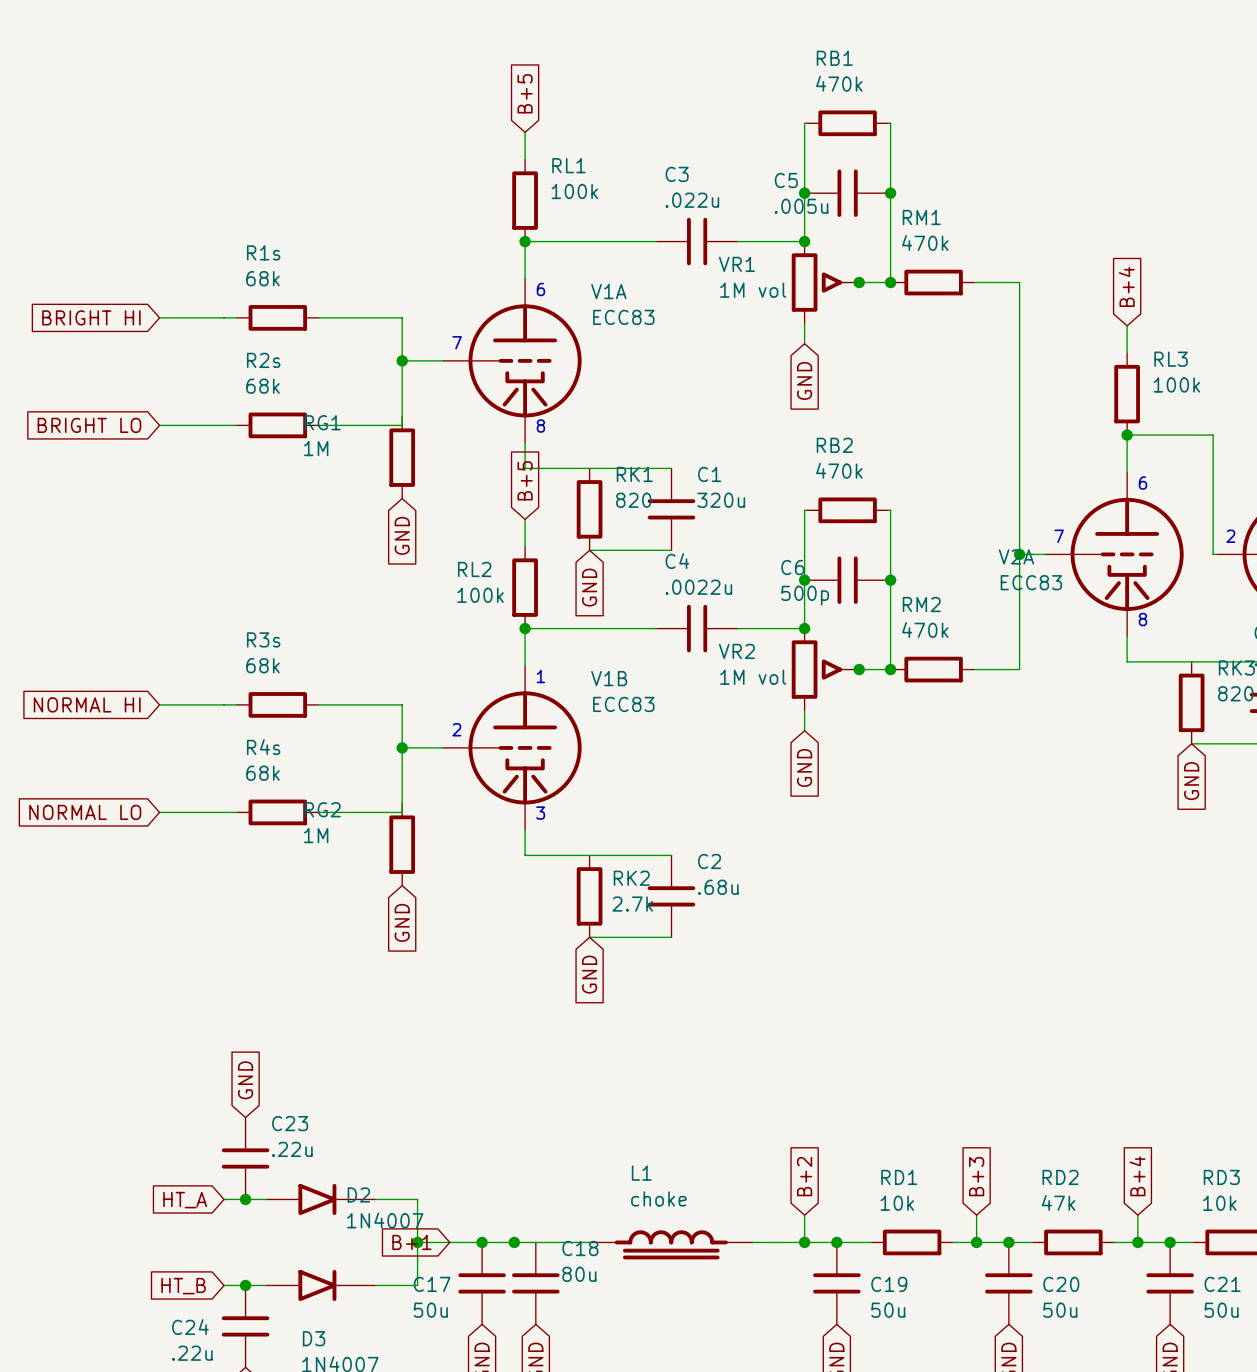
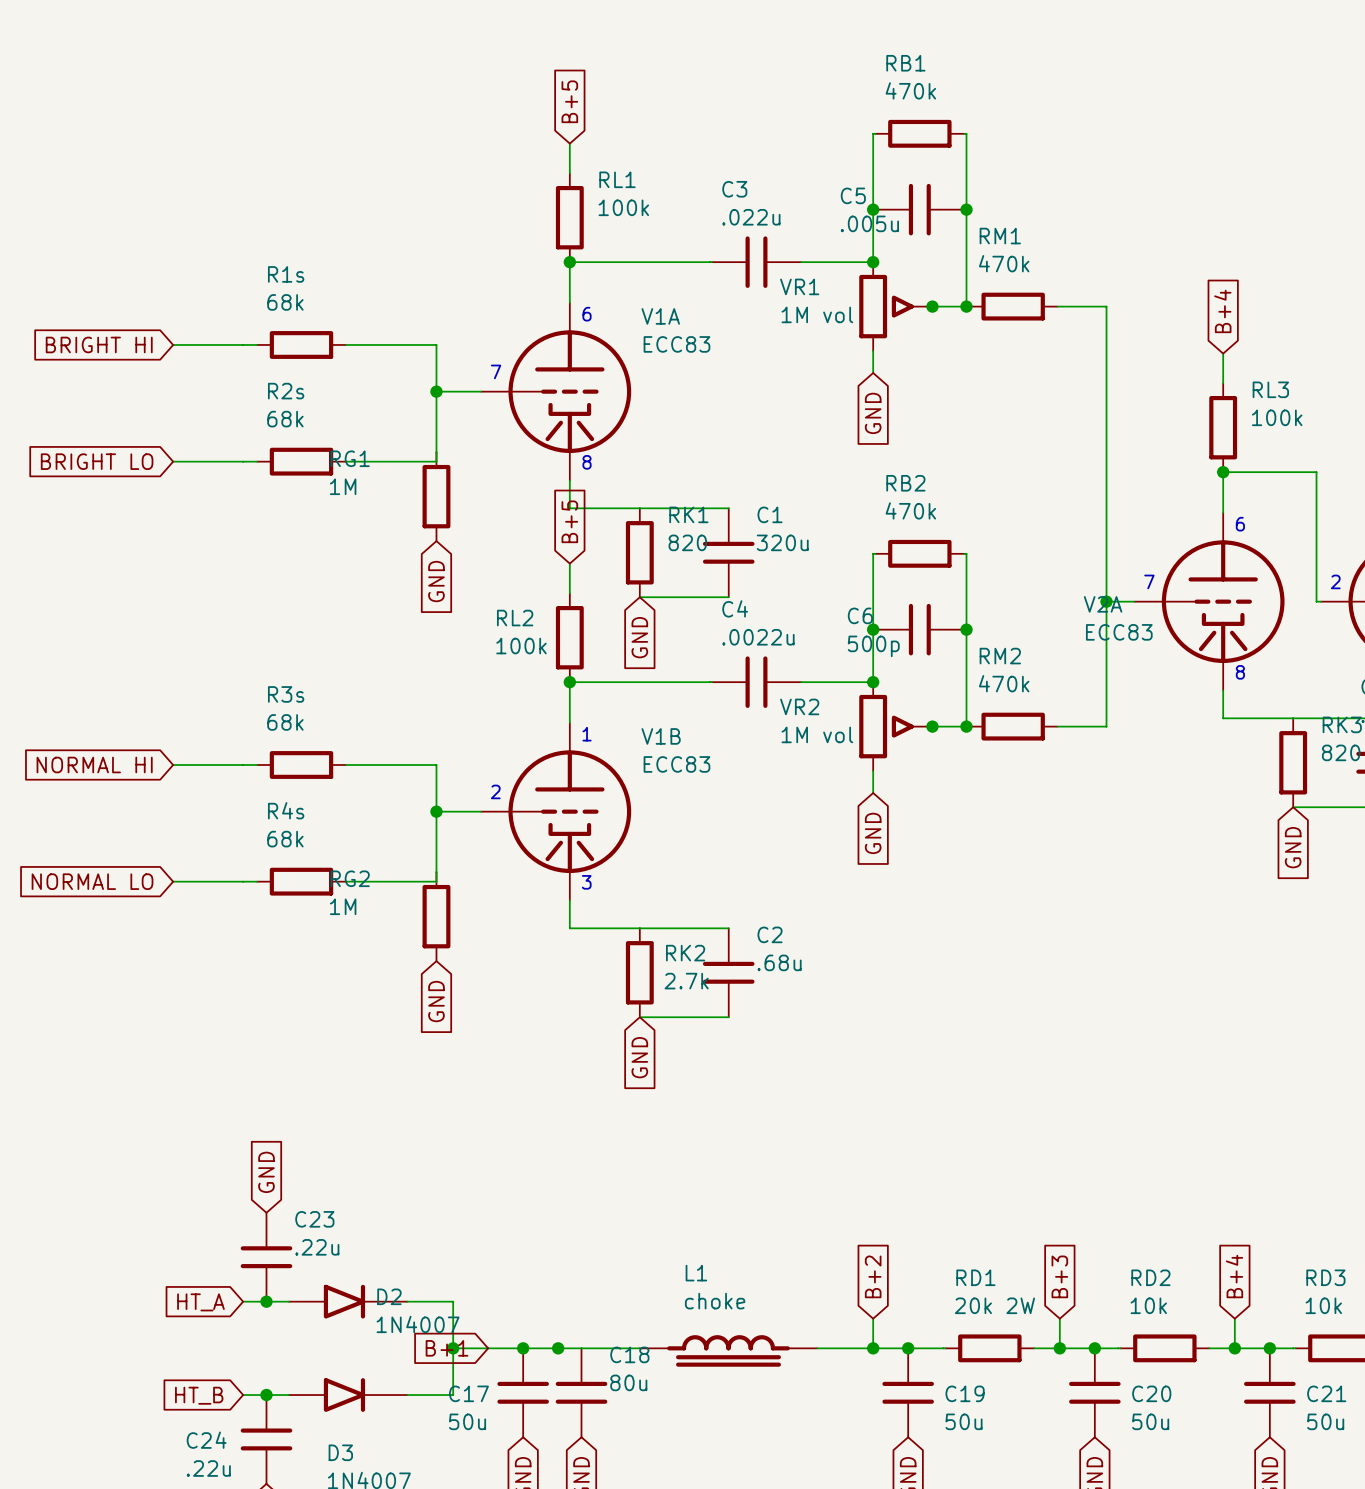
RD2 value: 47k (1058, 1202) -> 10k (1148, 1305)
RD1 value: 10k (897, 1203) -> 20k 2W (994, 1305)

